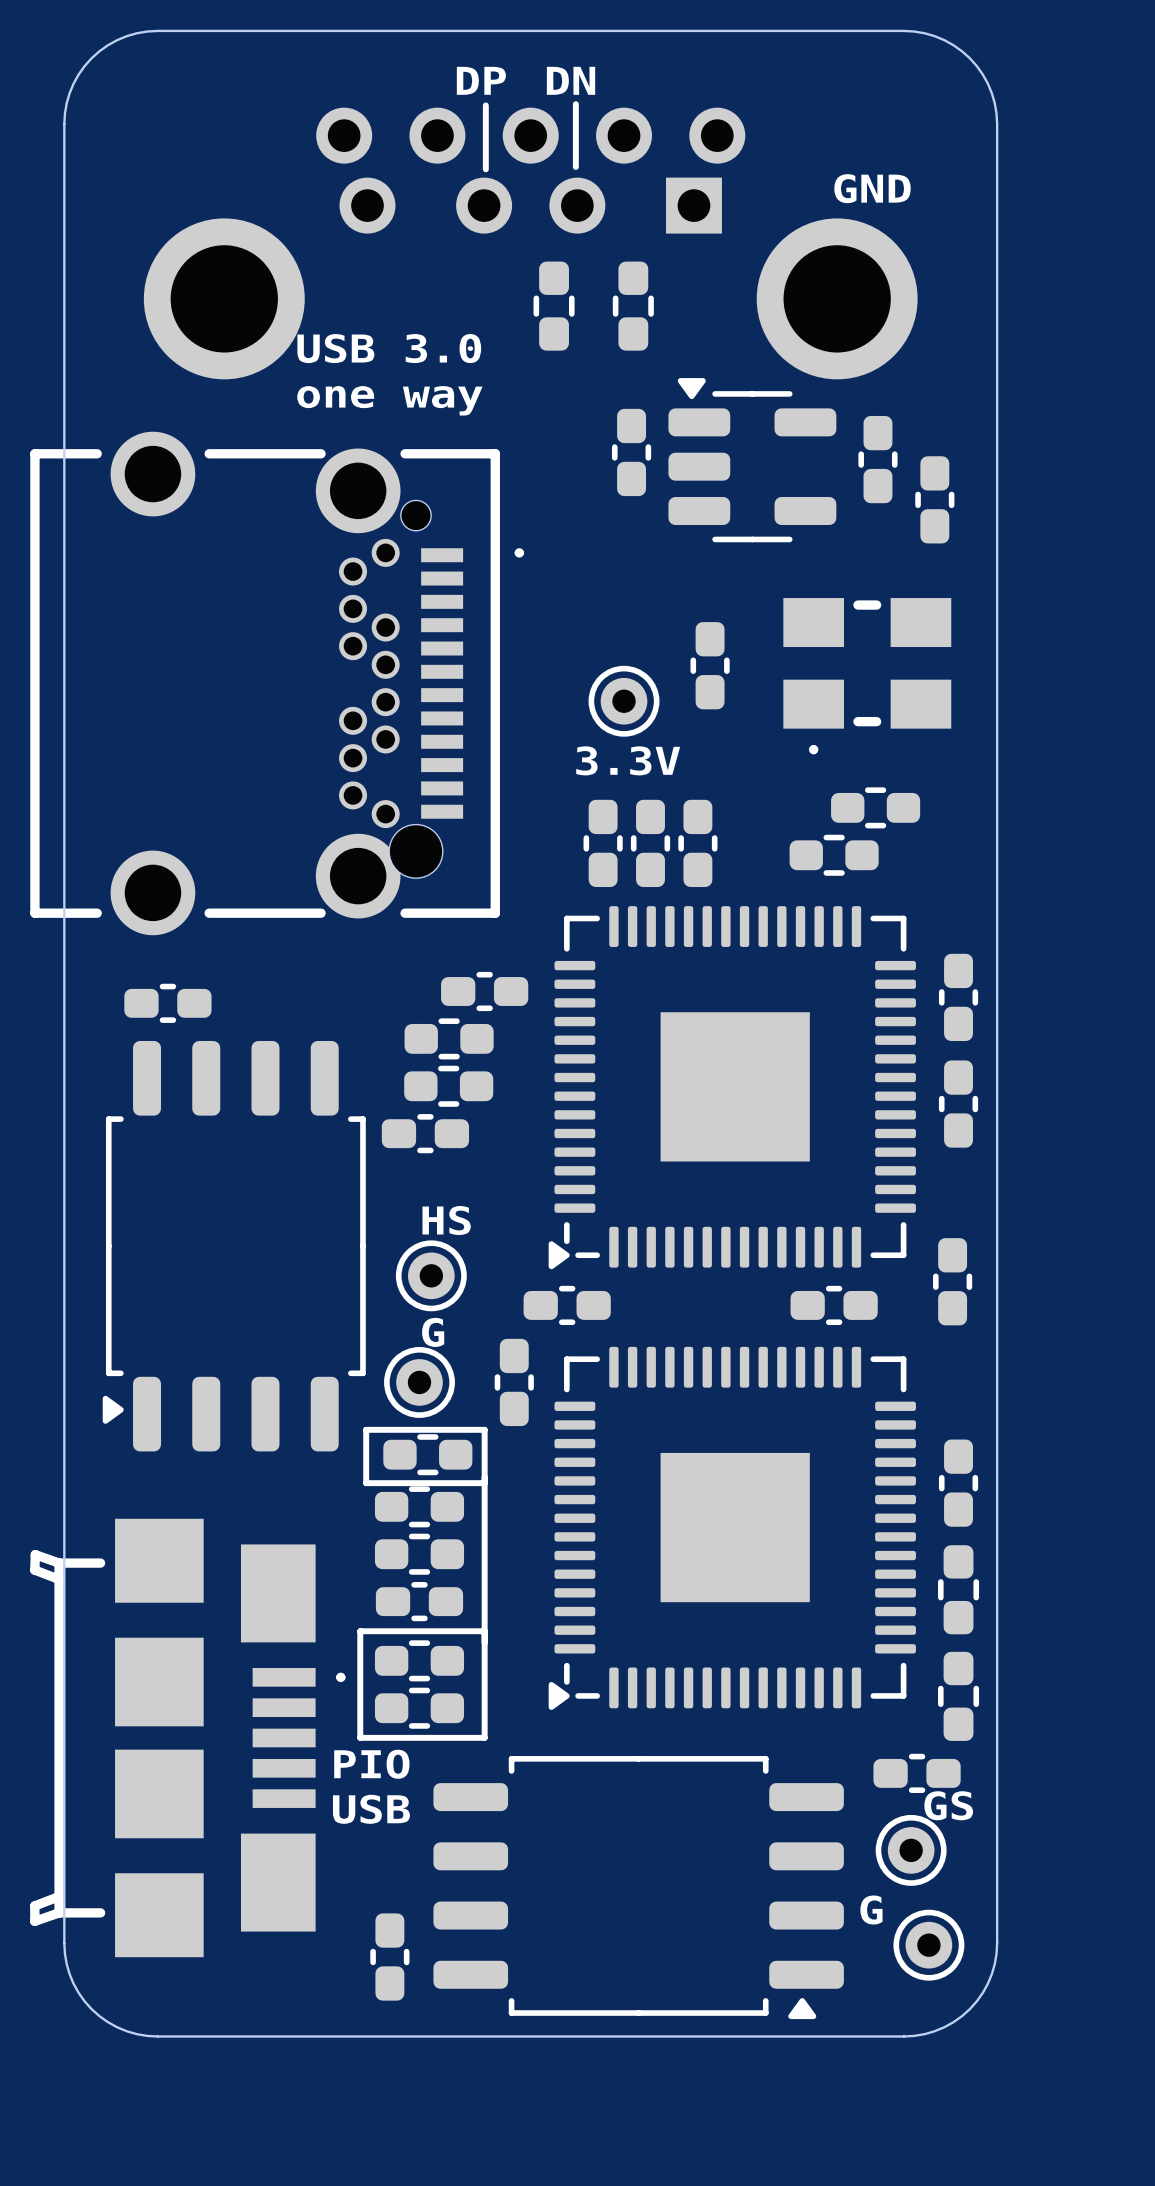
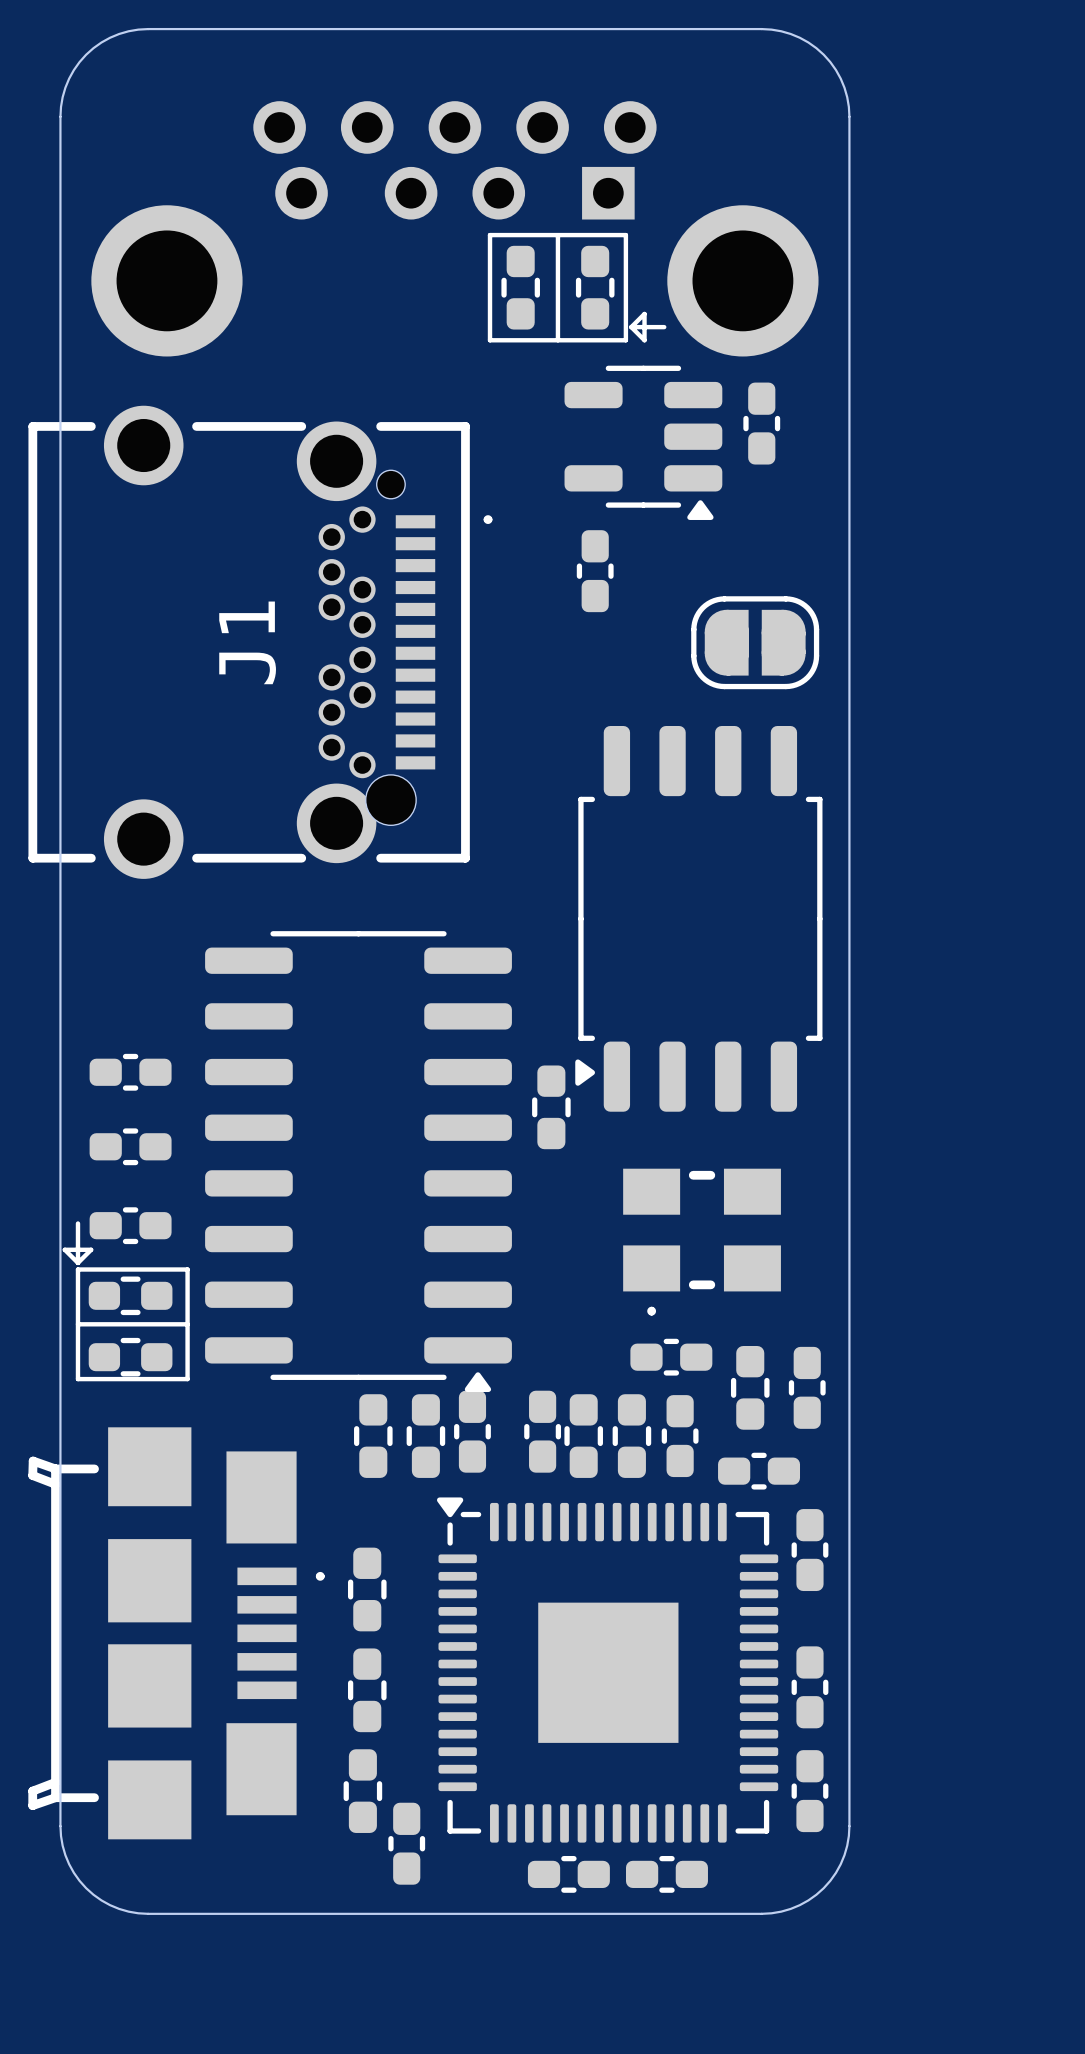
board edge: (810, 30) (914, 31) (944, 40) (962, 51) (982, 74) (994, 103) (997, 124) (996, 1953) (991, 1974) (982, 1992) (969, 2009) (944, 2027) (914, 2035) (810, 2036) -> (761, 29) (781, 31) (799, 37) (823, 54) (840, 78) (847, 97) (849, 116) (849, 1826) (847, 1845) (840, 1864) (823, 1888) (799, 1905) (781, 1911) (761, 1913)
text: DP (481, 80) -> none
text: DN (571, 80) -> none
line: (575, 104) (575, 166) -> none
line: (485, 105) (485, 169) -> none
text: GND (872, 188) -> none
part position: (530, 243) -> (454, 228)
line: none -> (490, 235) (625, 235) (625, 340) (490, 340) (490, 235)
line: none -> (557, 235) (557, 340)
text: USB 3.0 (389, 348) -> none
line: none -> (631, 327) (644, 340) (644, 313) (631, 327)
line: none -> (631, 327) (664, 327)
text: one way (389, 400) -> none
part: none -> (761, 423)
part: (631, 452) -> none
part: (877, 459) -> none
part rotation: 0° (752, 460) -> 180° (643, 442)
part: (934, 499) -> none
part: none -> (595, 571)
part: (710, 665) -> none
part position: (867, 676) -> (702, 1242)
part: none -> (755, 642)
J1 name: none -> J1 (247, 642)
part: (624, 701) -> none
text: 3.3V (628, 760) -> none
part: (875, 807) -> none
part: (603, 843) -> none
part: (650, 843) -> none
part: (697, 843) -> none
part: (834, 855) -> none
part: none -> (698, 918)
part: (484, 991) -> none
part: (958, 997) -> none
part: (167, 1003) -> none
part: (449, 1038) -> none
part: (448, 1086) -> none
part rotation: 0° (732, 1087) -> 90° clockwise (607, 1670)
part position: (732, 1087) -> (607, 1670)
part: (958, 1104) -> none
part: (425, 1133) -> none
part: none -> (130, 1072)
part: none -> (551, 1107)
part: none -> (130, 1146)
text: HS (446, 1220) -> none
part: none -> (358, 1161)
part: (234, 1246) -> none
part: (431, 1275) -> none
part: (952, 1281) -> none
line: none -> (77, 1223) (77, 1262)
part: none -> (130, 1225)
part: (567, 1305) -> none
part: (834, 1305) -> none
text: G (433, 1332) -> none
line: none -> (77, 1262) (91, 1249) (64, 1249) (77, 1262)
part footprint: [548, 1346, 916, 1710] -> [661, 1395, 699, 1478]
line: none -> (77, 1269) (77, 1379) (187, 1379) (187, 1269) (77, 1269)
part: none -> (130, 1295)
part: (419, 1382) -> none
part: (514, 1382) -> none
line: none -> (77, 1324) (187, 1324)
part: none -> (130, 1357)
part: none -> (671, 1357)
part: (427, 1454) -> none
part: none -> (750, 1387)
part: none -> (807, 1387)
line: (484, 1483) (366, 1483) (366, 1429) (484, 1429) (484, 1737) (360, 1737) (360, 1631) (484, 1631) -> none
part: (958, 1483) -> none
part: (419, 1506) -> none
part: none -> (472, 1431)
part: none -> (542, 1431)
part: none -> (373, 1436)
part: none -> (425, 1436)
part: none -> (583, 1436)
part: none -> (631, 1436)
part: (419, 1554) -> none
part: none -> (759, 1471)
part: (958, 1589) -> none
part: (419, 1601) -> none
part: none -> (809, 1550)
part: (419, 1660) -> none
part: none -> (367, 1589)
part: (958, 1696) -> none
part: (419, 1708) -> none
text: PIO (371, 1764) -> none
part rotation: 0° (917, 1773) -> 90° clockwise (809, 1687)
part position: (917, 1773) -> (809, 1687)
part: none -> (367, 1690)
text: GS (948, 1805) -> none
text: USB (371, 1809) -> none
part: (911, 1850) -> none
part: (638, 1887) -> none
part: none -> (362, 1791)
part: none -> (809, 1791)
text: G (871, 1910) -> none
part: (928, 1945) -> none
part position: (389, 1957) -> (406, 1843)
part: none -> (568, 1874)
part: none -> (666, 1874)

